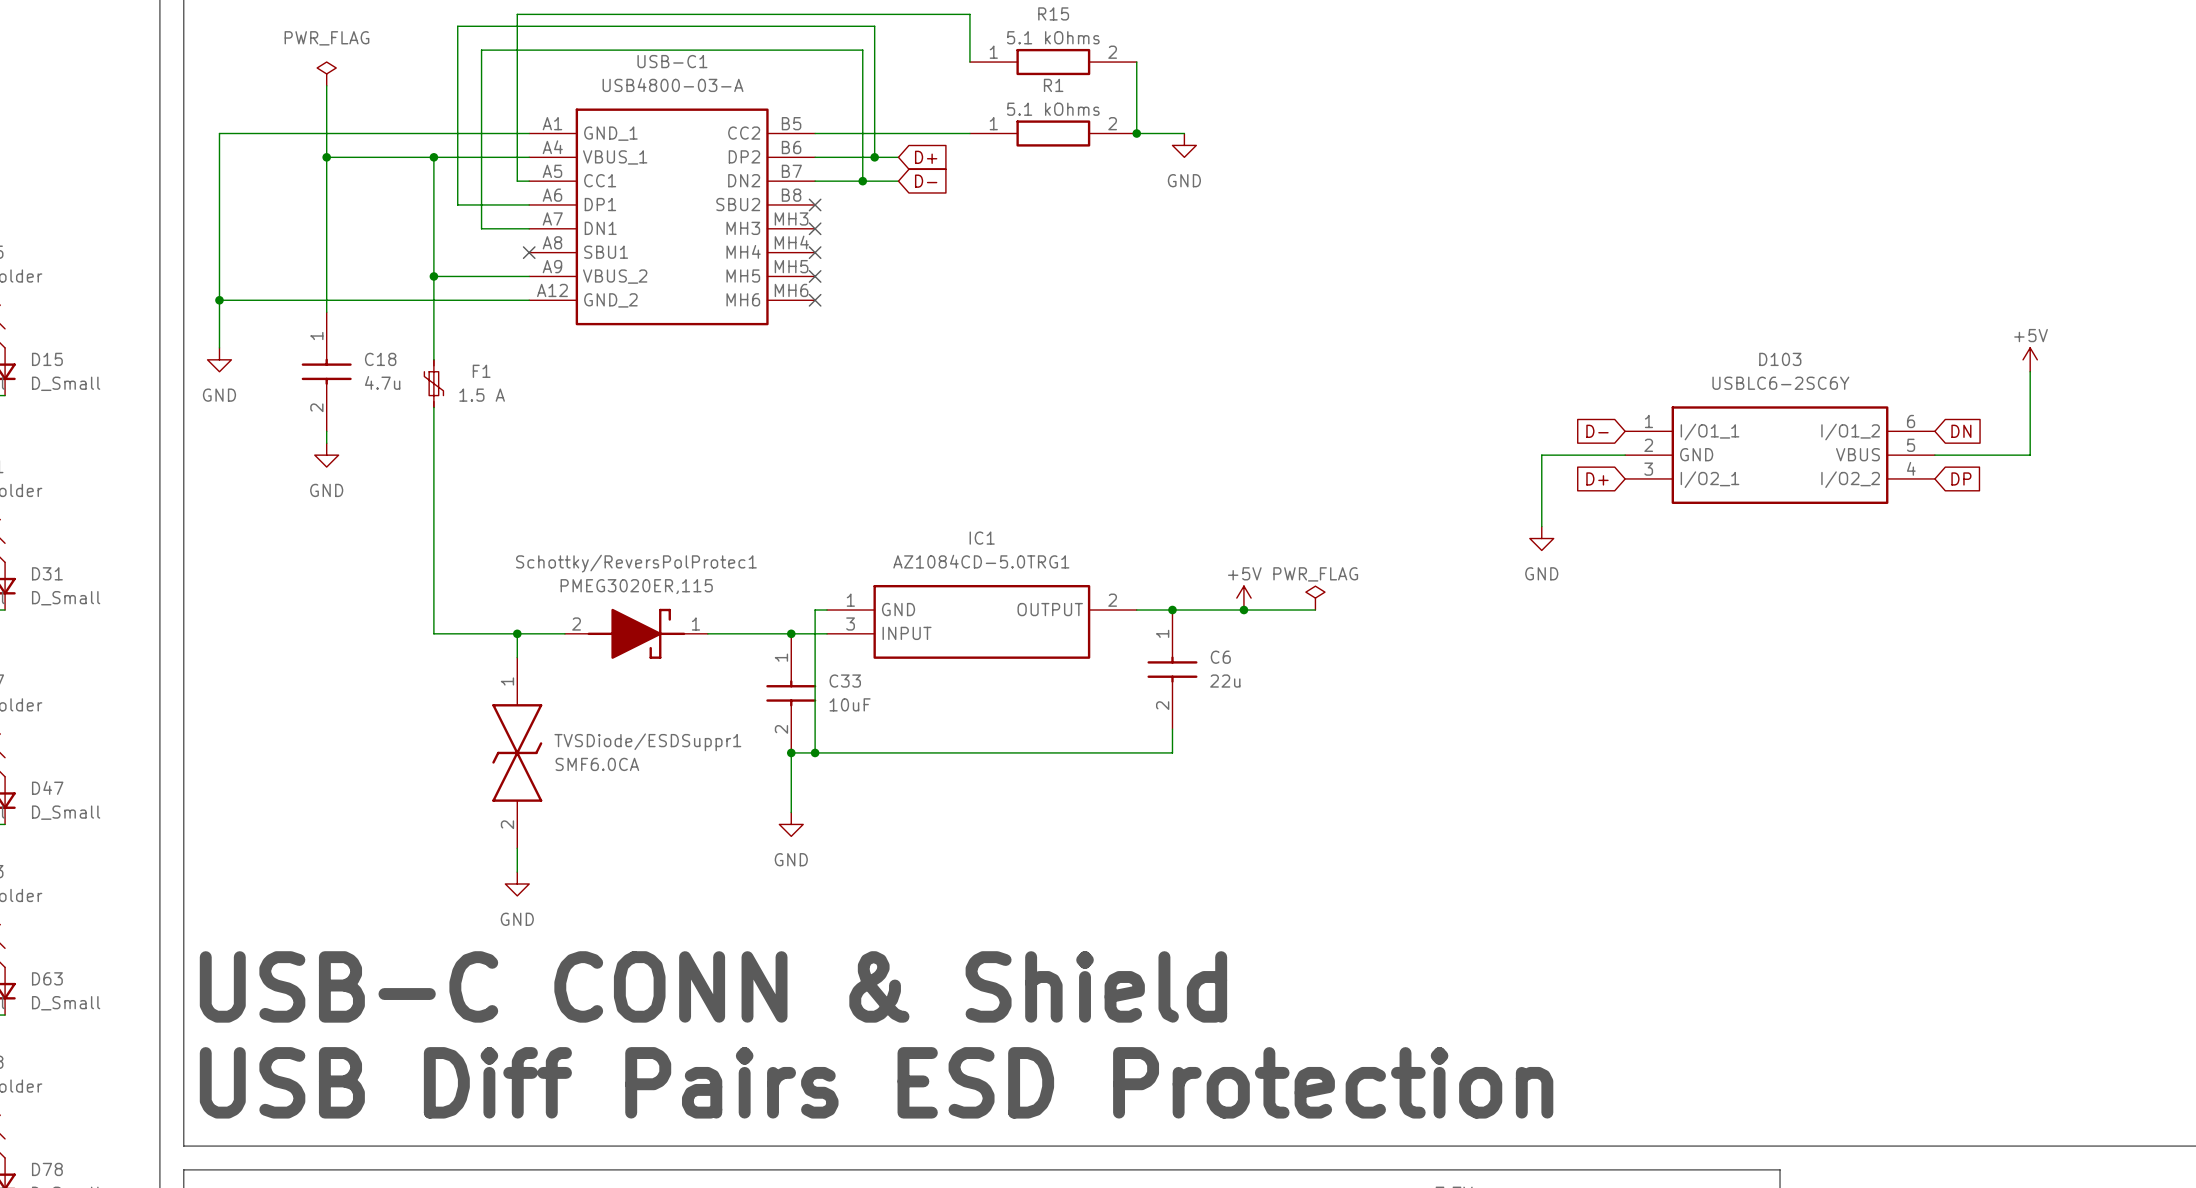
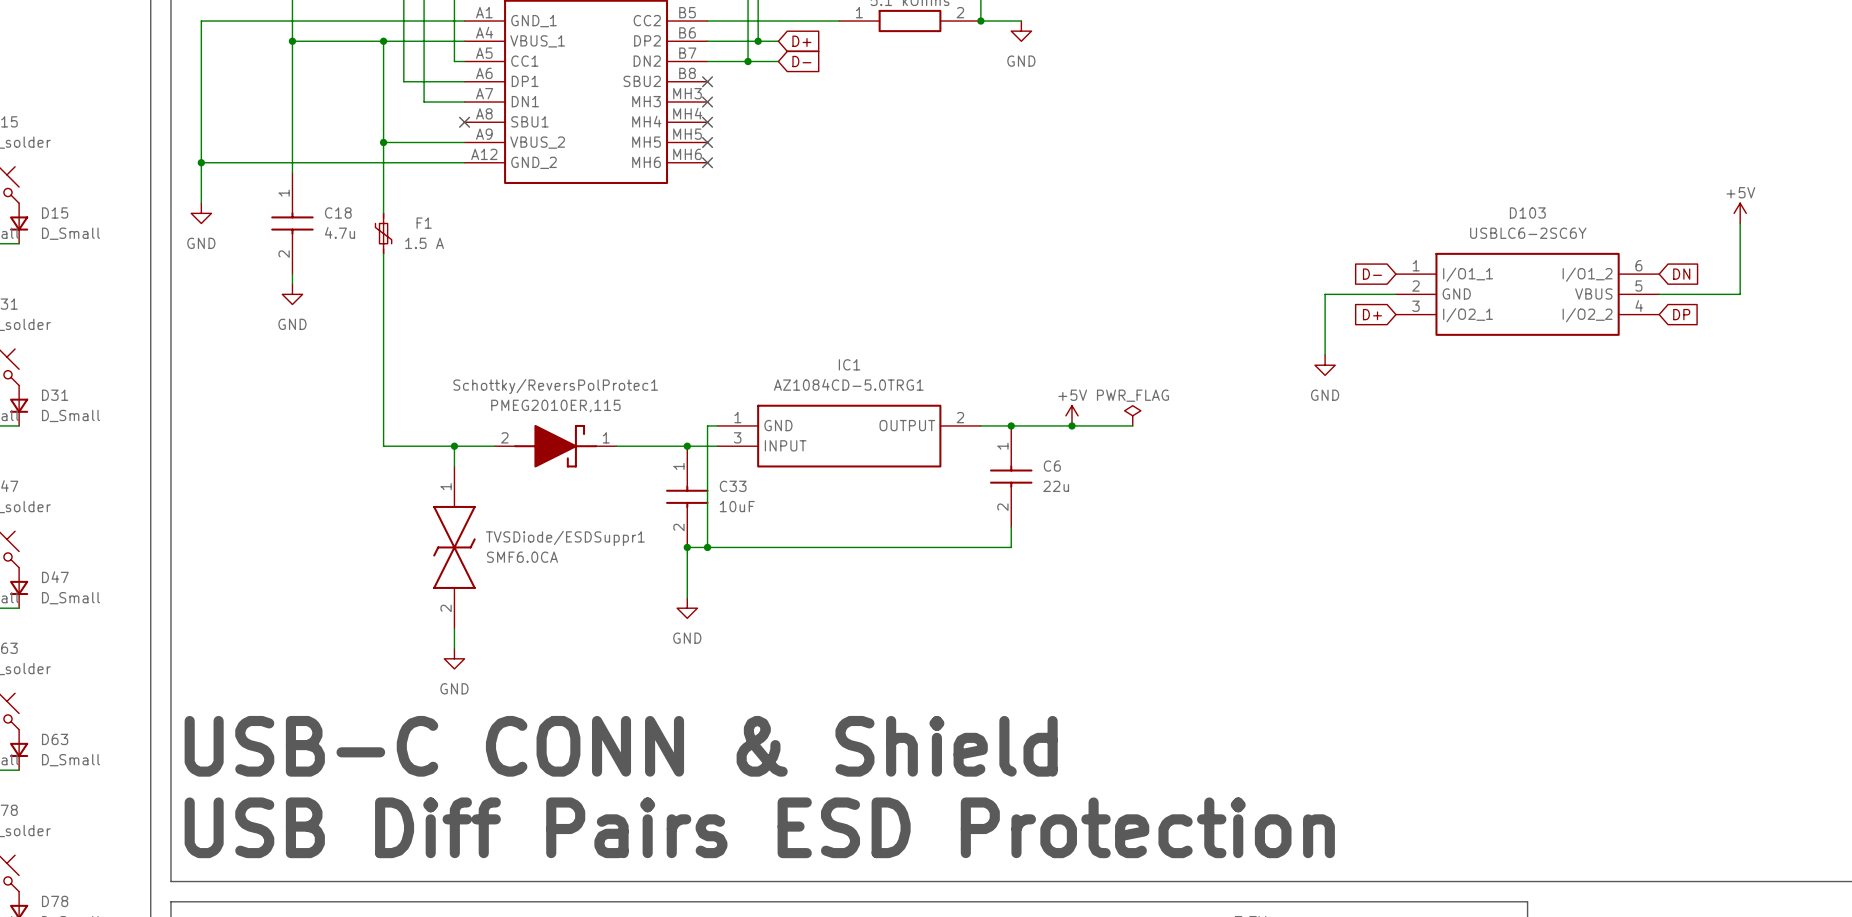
Schottky/ReversPolProtec1 value: PMEG3020ER,115 (636, 586) -> PMEG2010ER,115 (555, 406)

